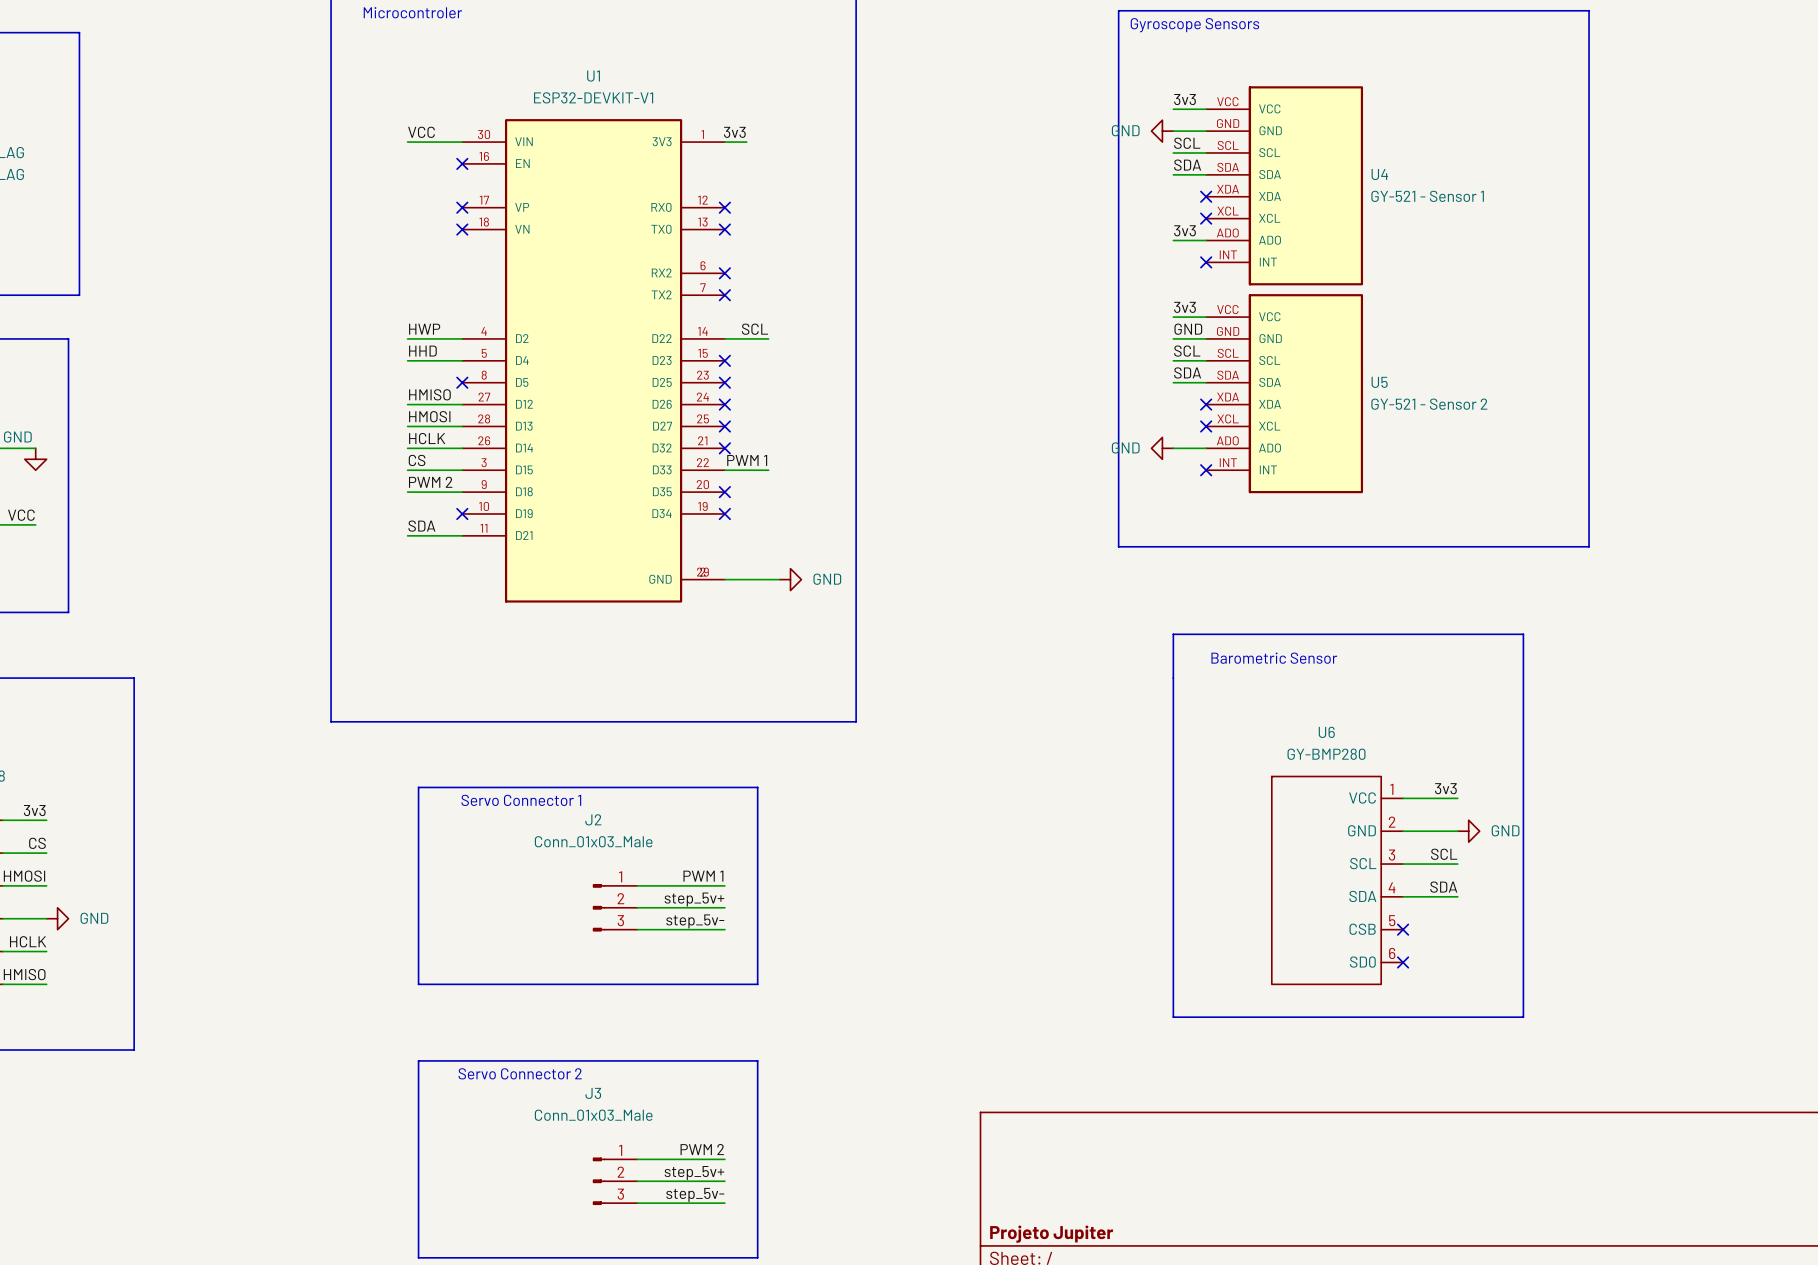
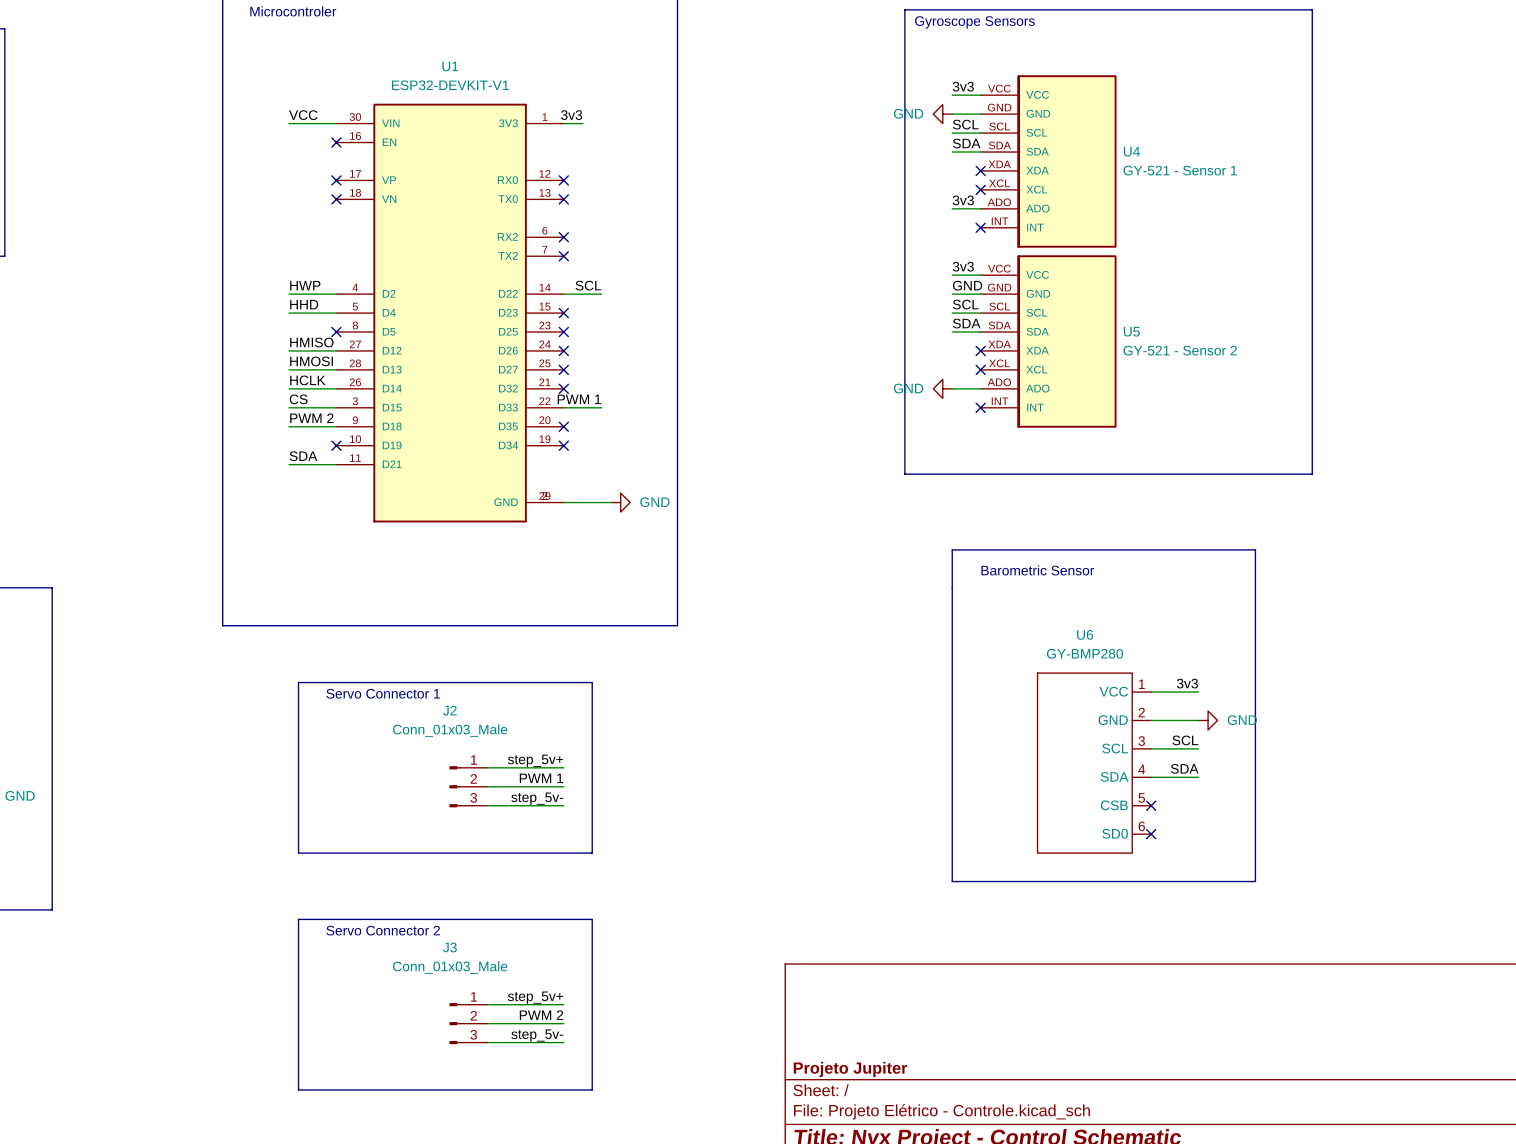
label: PWM 1 (703, 876) -> step_5v+ (535, 760)
label: step_5v+ (694, 899) -> PWM 1 (541, 778)
label: PWM 2 (702, 1149) -> step_5v+ (535, 997)
label: step_5v+ (694, 1173) -> PWM 2 (541, 1015)

